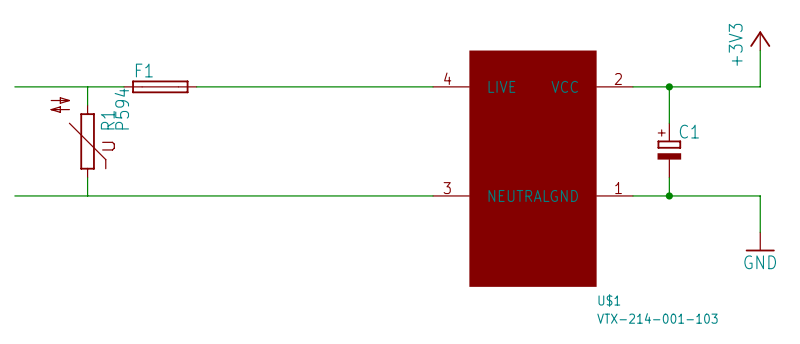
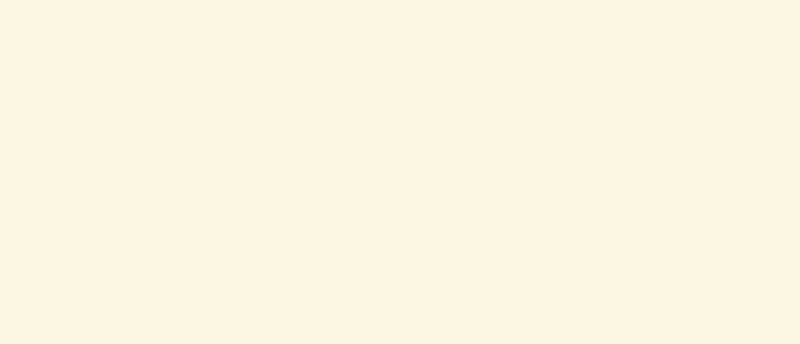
power symbol: +3V3 (760, 40) -> none
wire: (760, 50) (760, 86) (632, 86) -> none
wire: (14, 86) (123, 86) -> none
wire: (87, 86) (87, 105) -> none
F1: (160, 86) -> none
wire: (196, 86) (433, 86) -> none
wire: (669, 86) (669, 123) -> none
junction: (669, 86) -> none
R1: P594 (82, 137) -> none
C1: (669, 150) -> none
U$1: VTX-214-001-103 (532, 168) -> none
wire: (87, 177) (87, 195) -> none
wire: (669, 177) (669, 195) -> none
wire: (14, 195) (433, 195) -> none
wire: (632, 195) (760, 195) (760, 232) -> none
junction: (669, 195) -> none
power symbol: GND (760, 241) -> none

